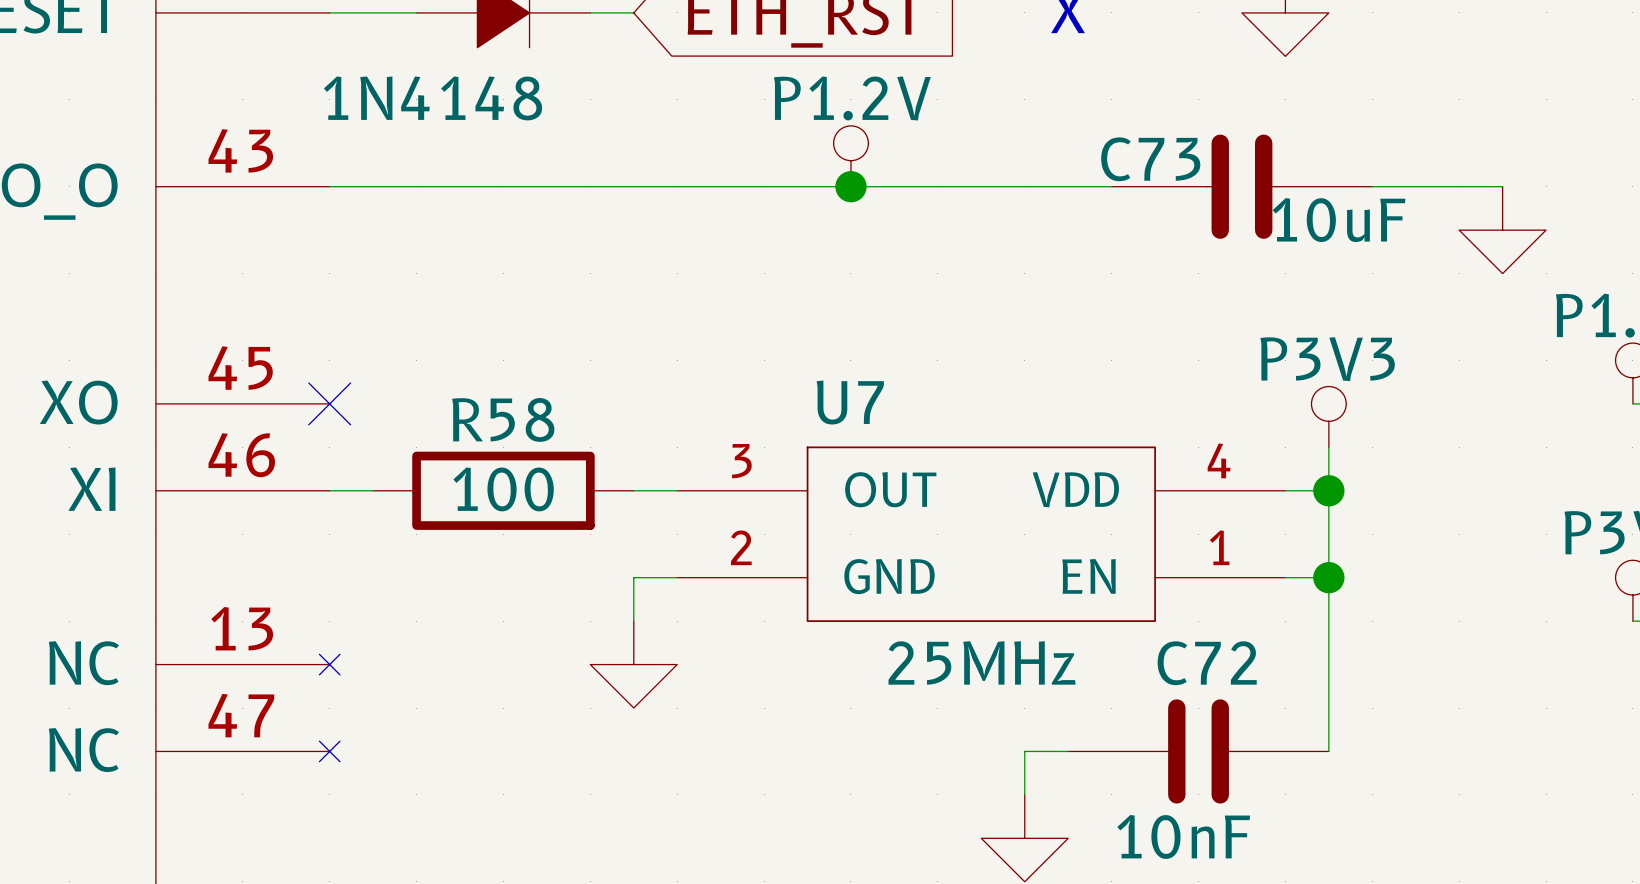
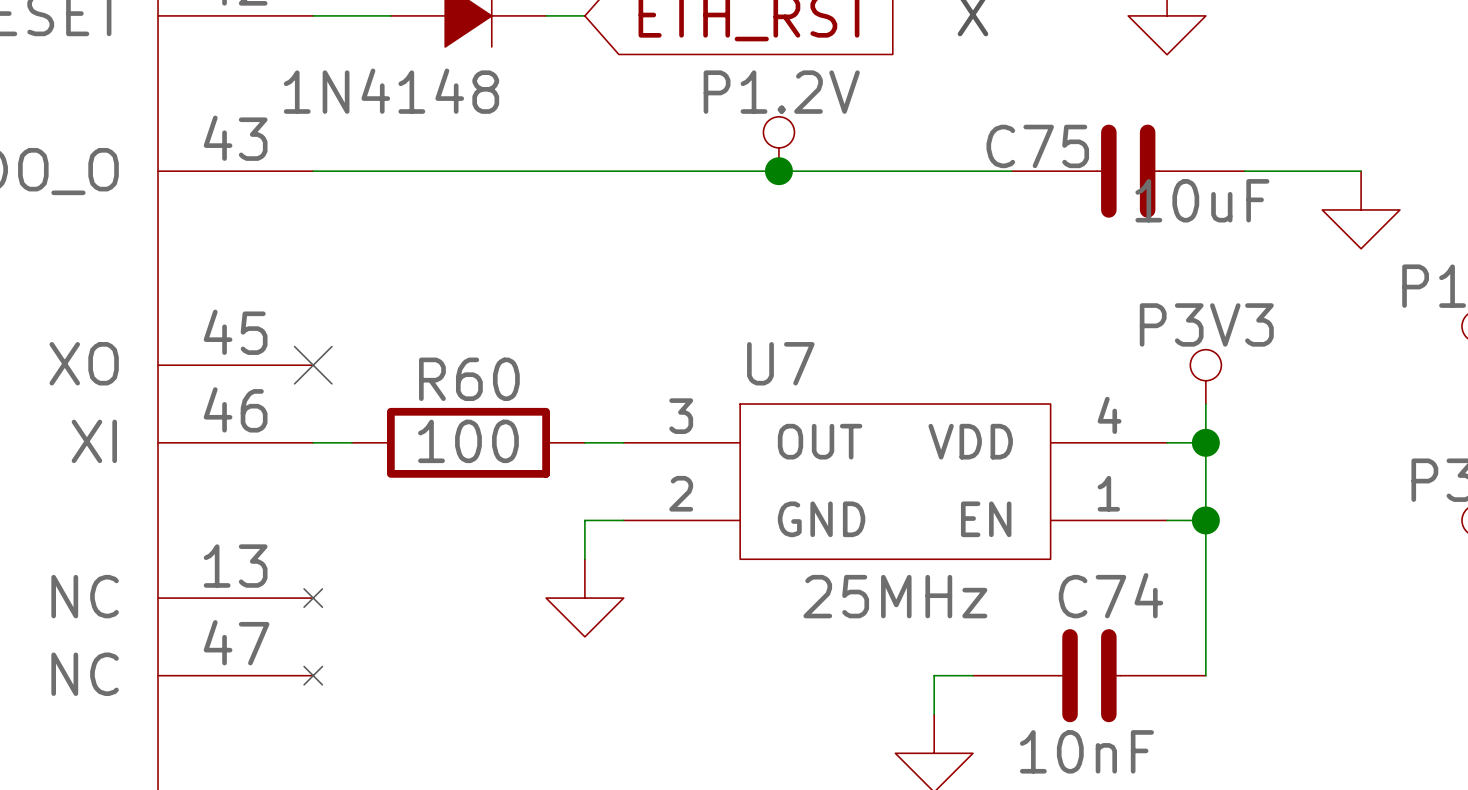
C73 name: C73 (1150, 159) -> C75 (1037, 146)
R58 name: R58 (503, 419) -> R60 (469, 379)
C72 name: C72 (1207, 663) -> C74 (1110, 595)

